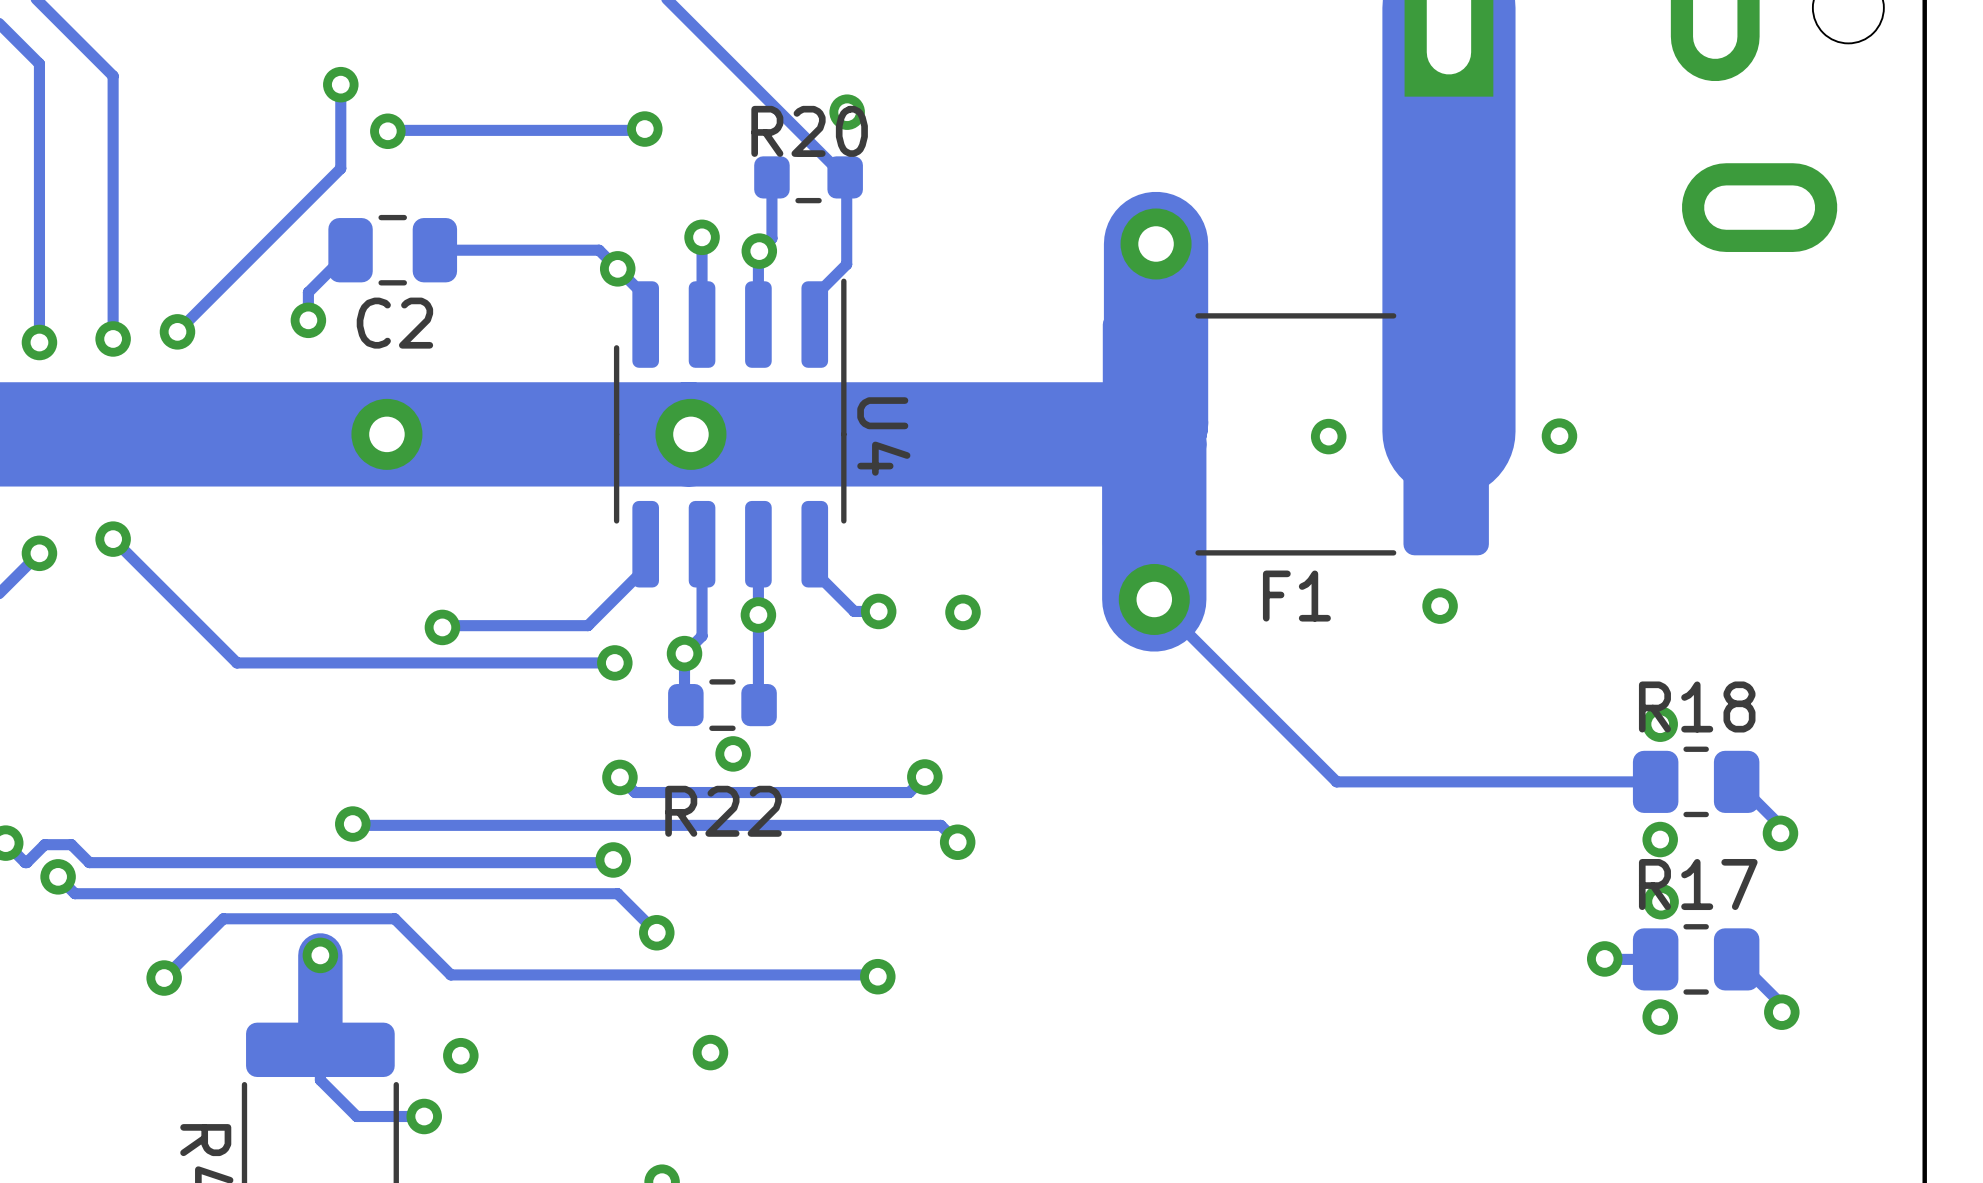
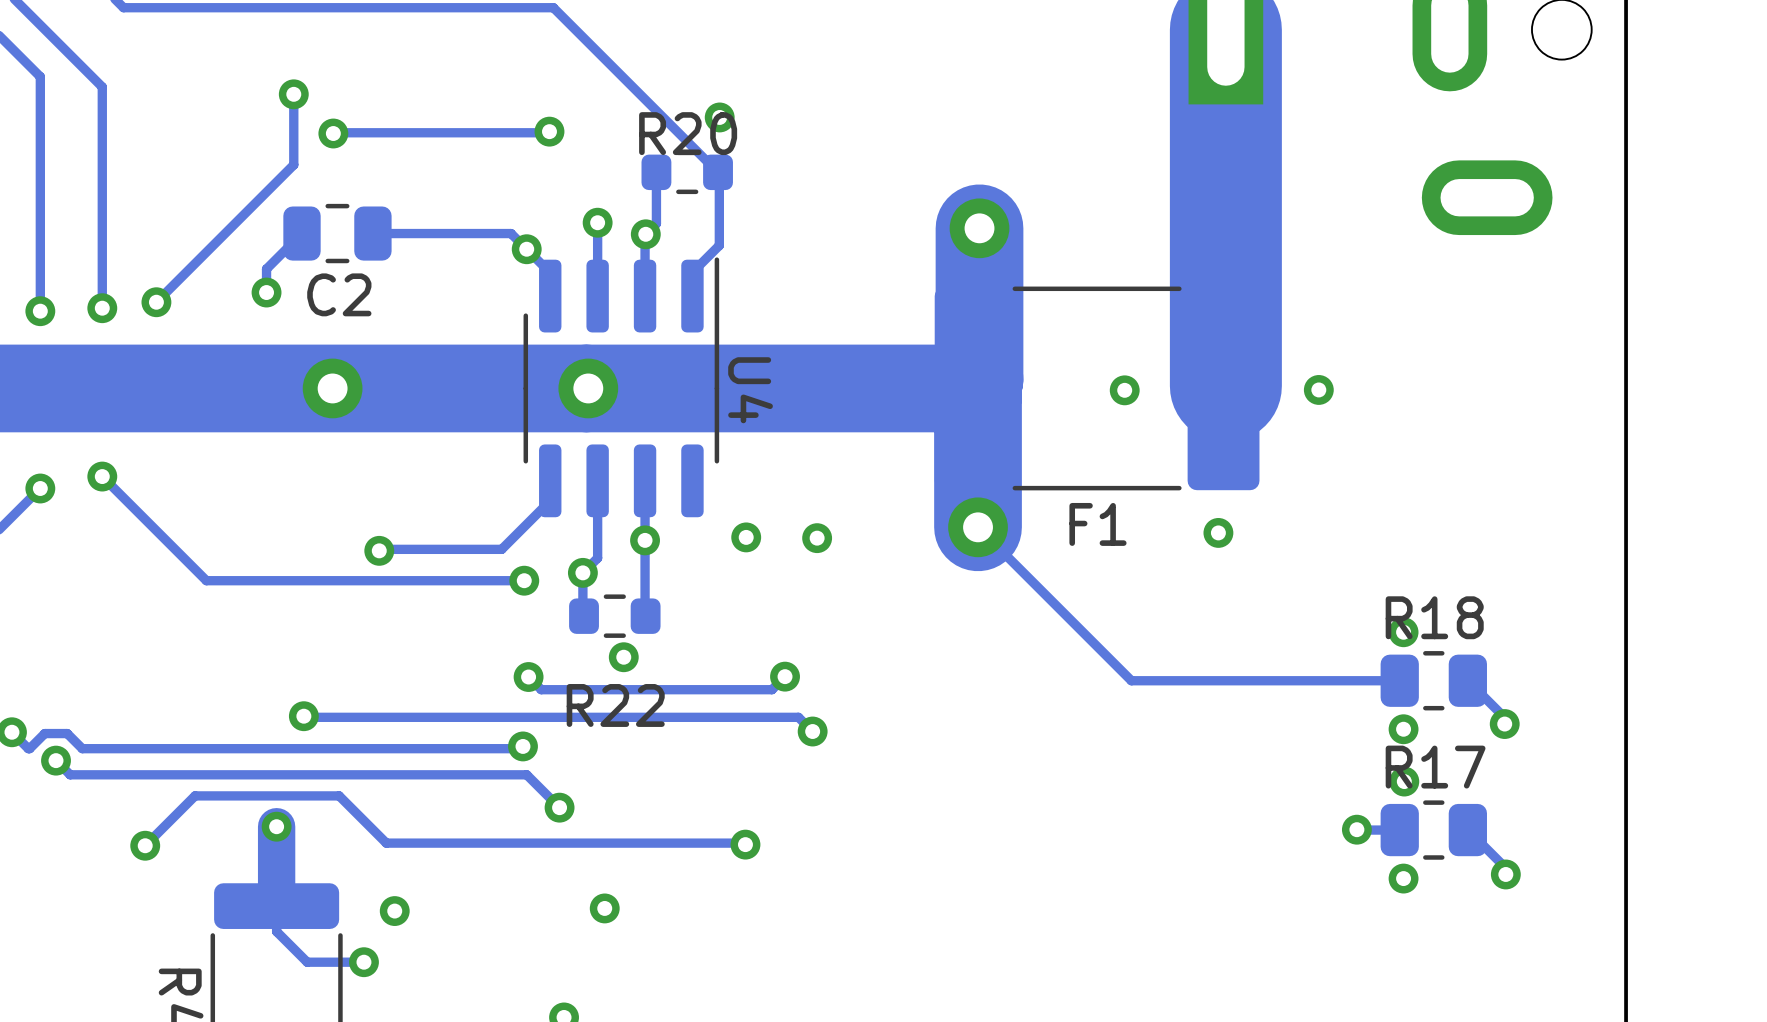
track: (814, 544) (814, 571) (854, 611) (878, 611) -> none

